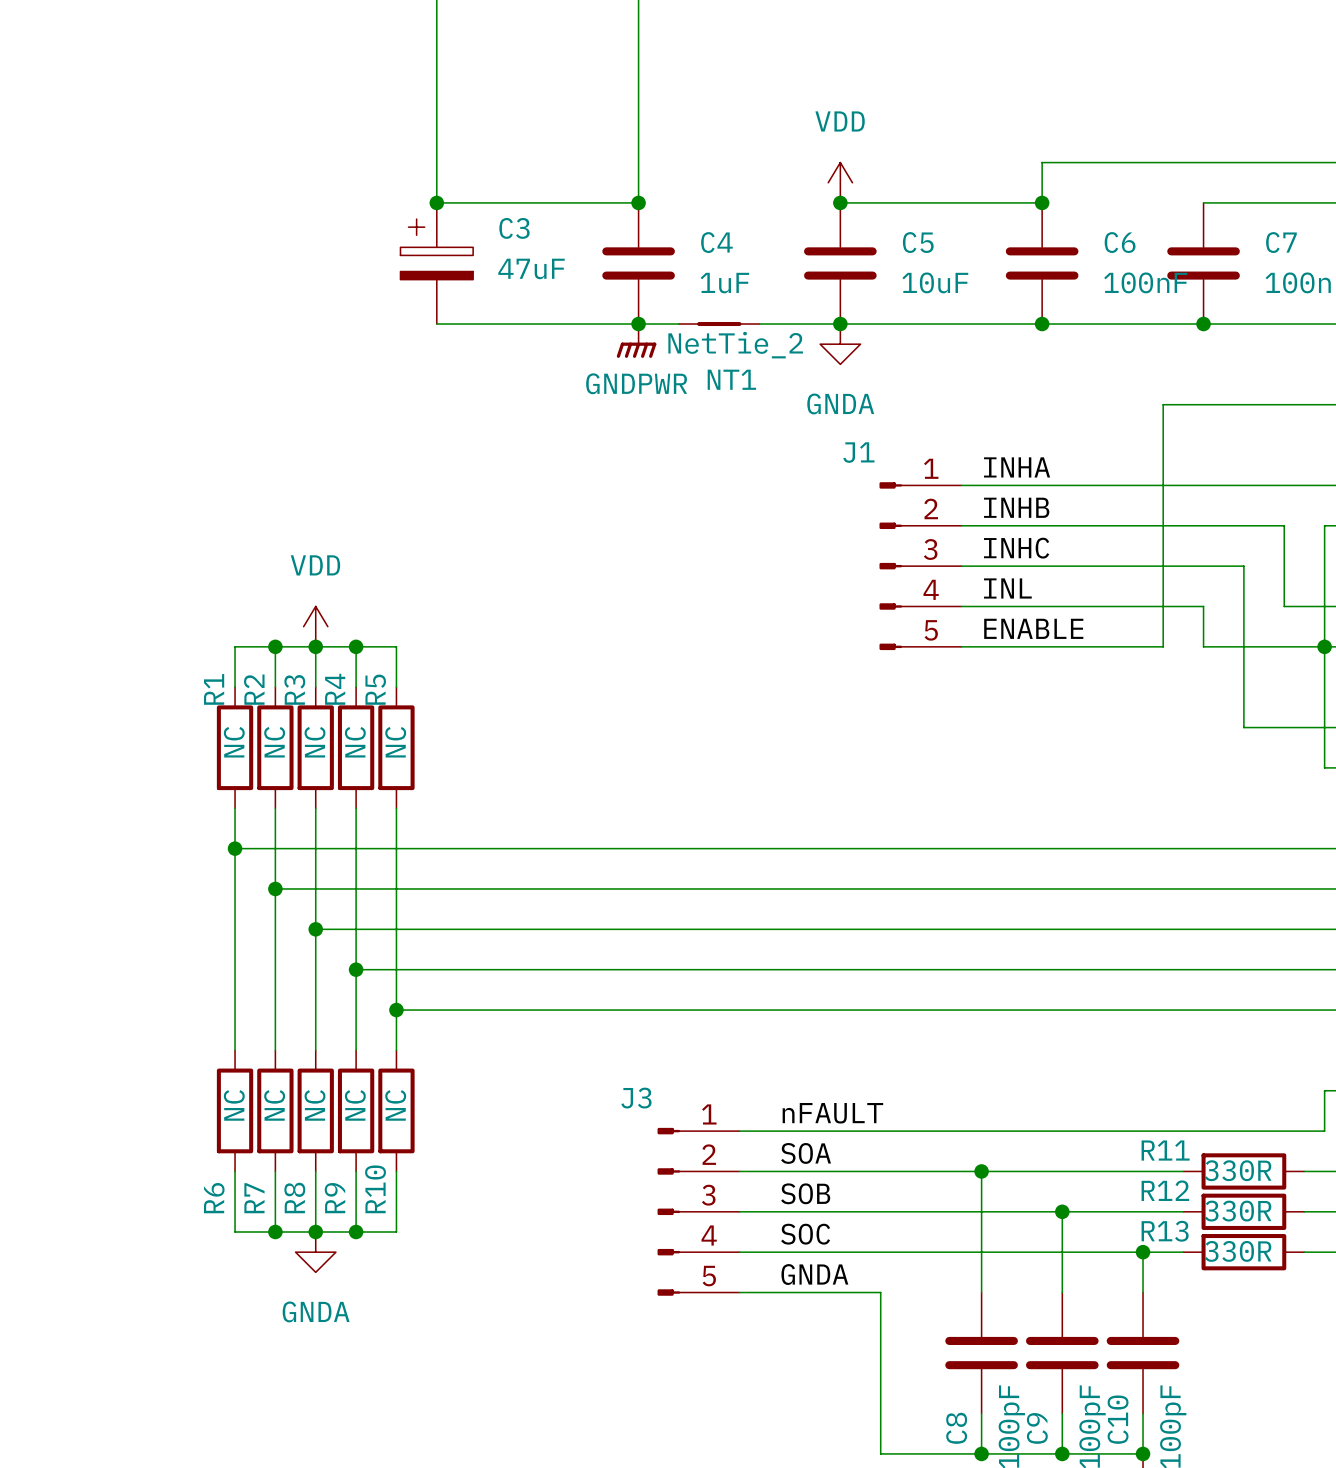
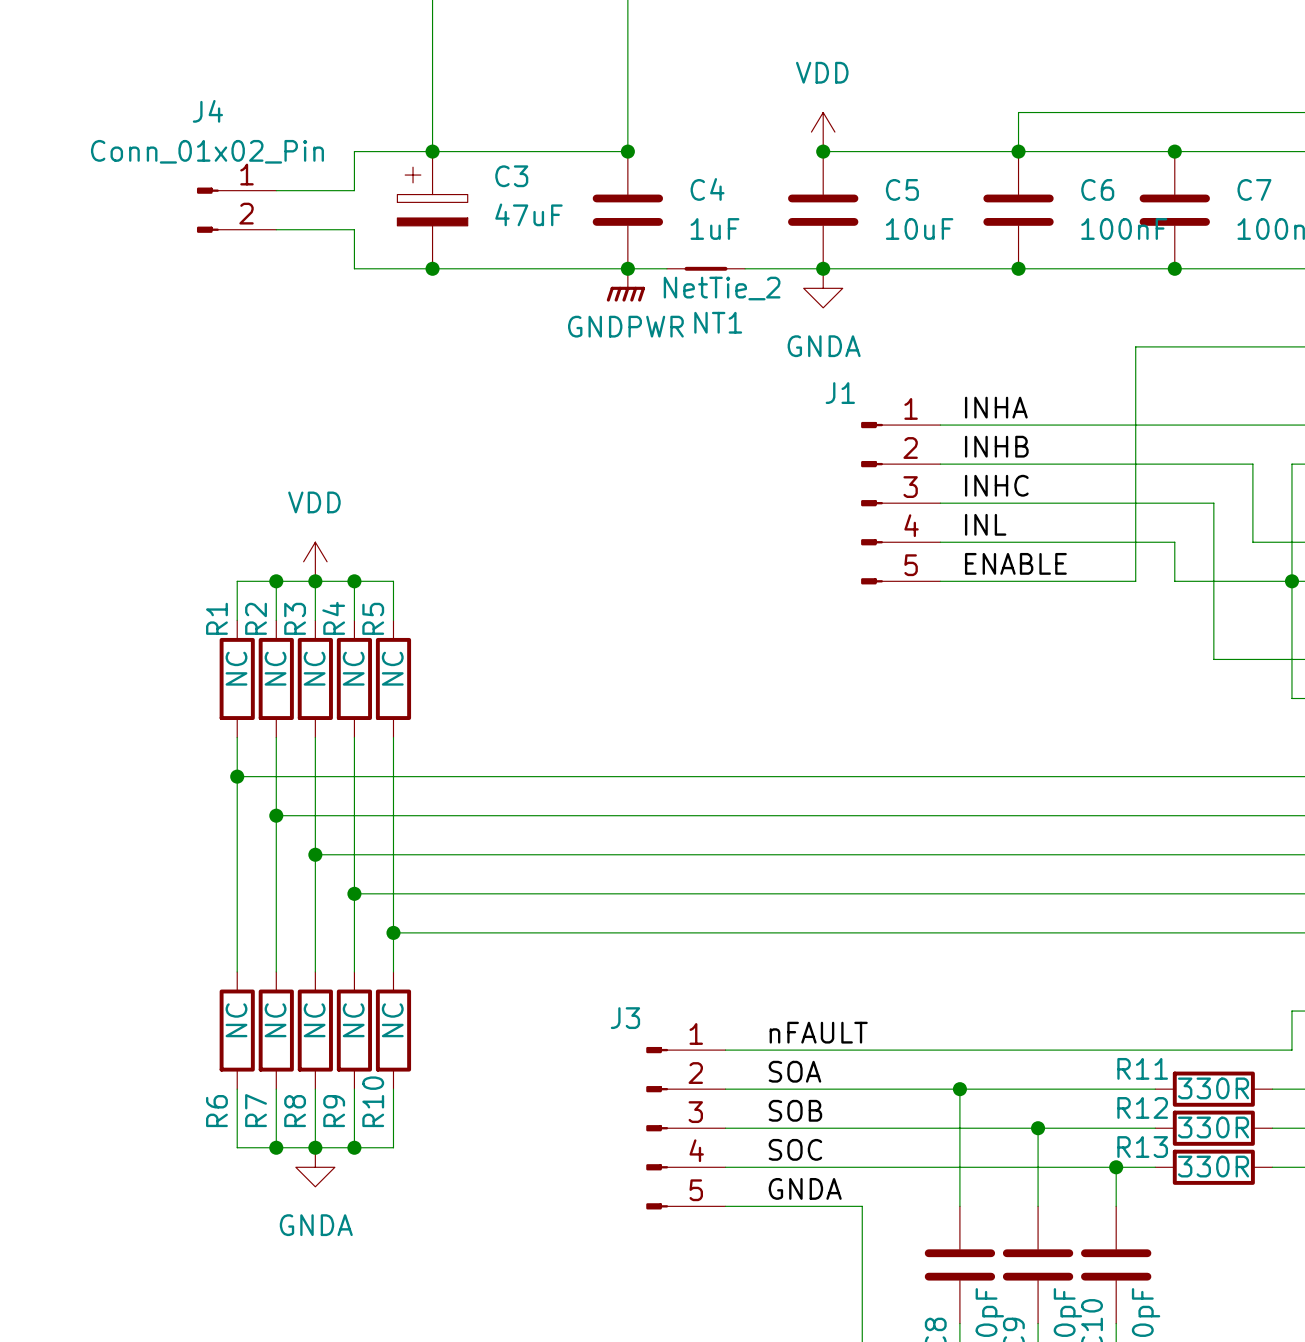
wire: none -> (432, 151) (354, 151) (354, 190) (276, 190)
wire: none -> (1018, 151) (1174, 151)
junction: none -> (1174, 151)
J4: none -> Conn_01x02_Pin (236, 210)
wire: none -> (276, 229) (354, 229) (354, 268) (432, 268)
junction: none -> (432, 268)

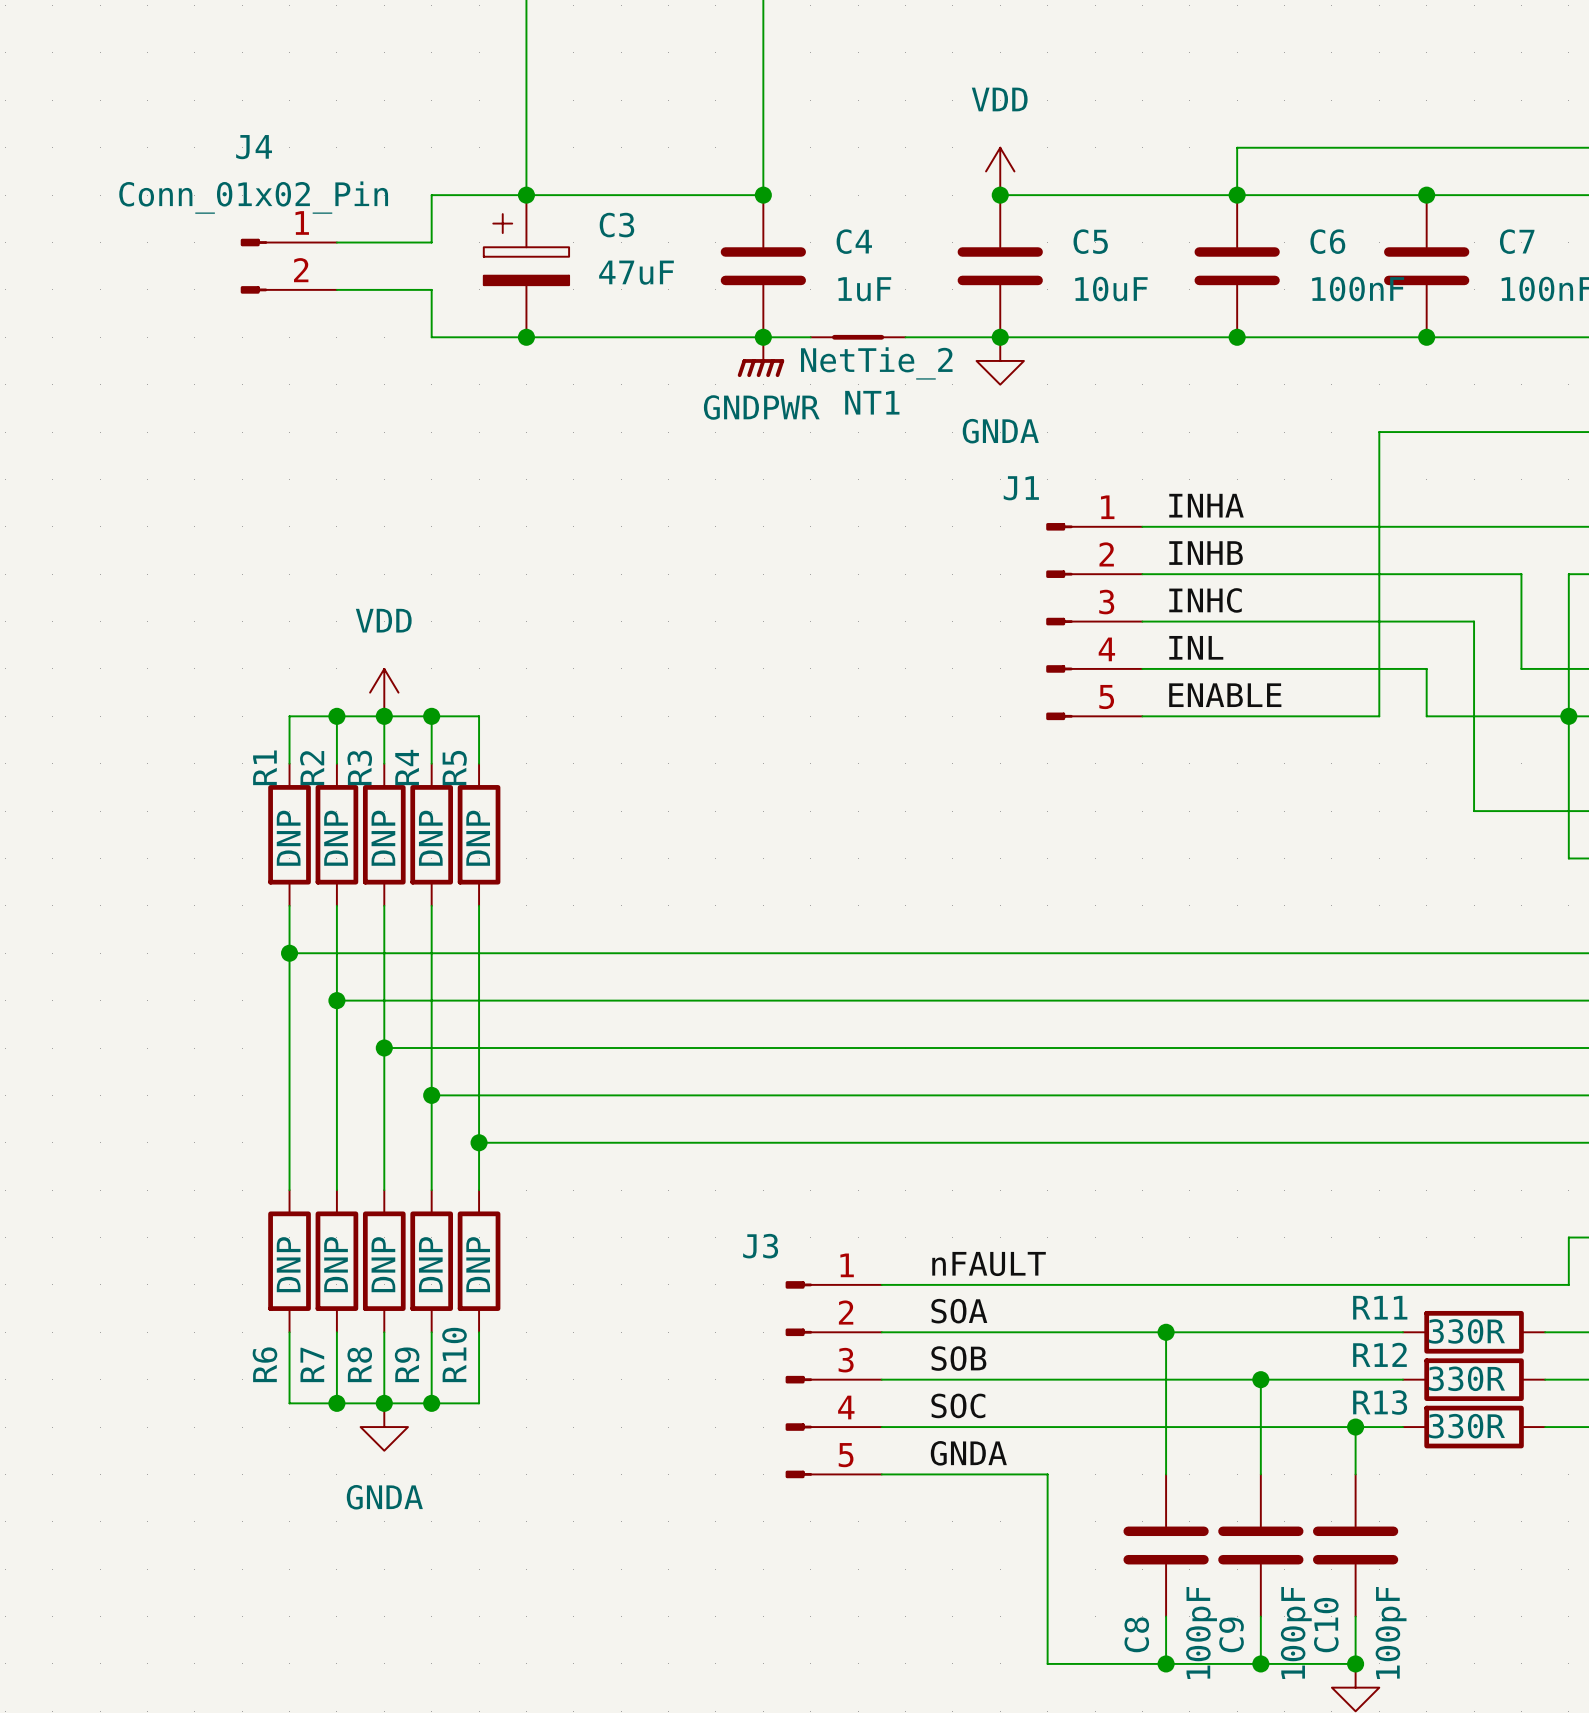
R1 value: NC (236, 668) -> DNP (288, 838)
R2 value: NC (275, 668) -> DNP (336, 838)
R3 value: NC (314, 668) -> DNP (383, 838)
R4 value: NC (353, 668) -> DNP (430, 838)
R5 value: NC (392, 668) -> DNP (478, 838)
R6 value: NC (236, 1020) -> DNP (288, 1264)
R7 value: NC (275, 1020) -> DNP (336, 1264)
R8 value: NC (314, 1020) -> DNP (383, 1264)
R9 value: NC (353, 1020) -> DNP (430, 1264)
R10 value: NC (392, 1020) -> DNP (478, 1264)

